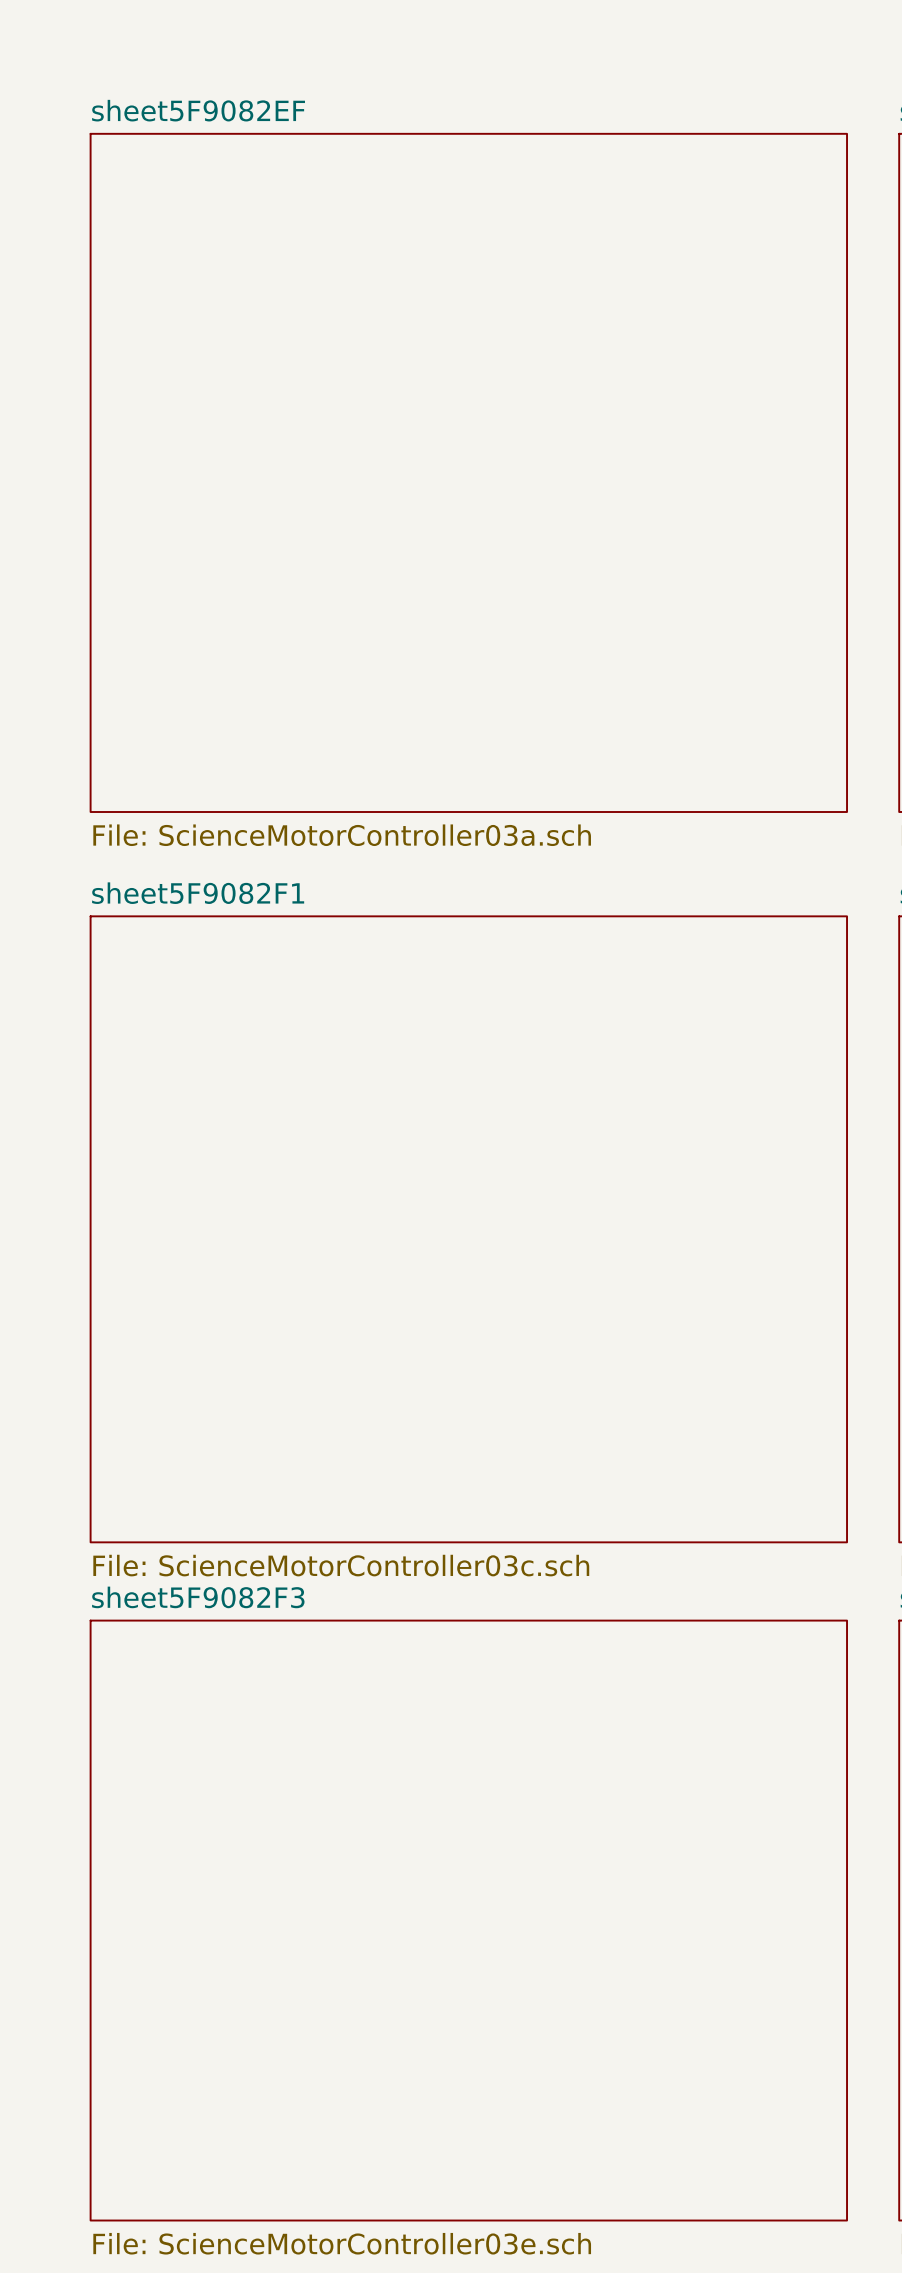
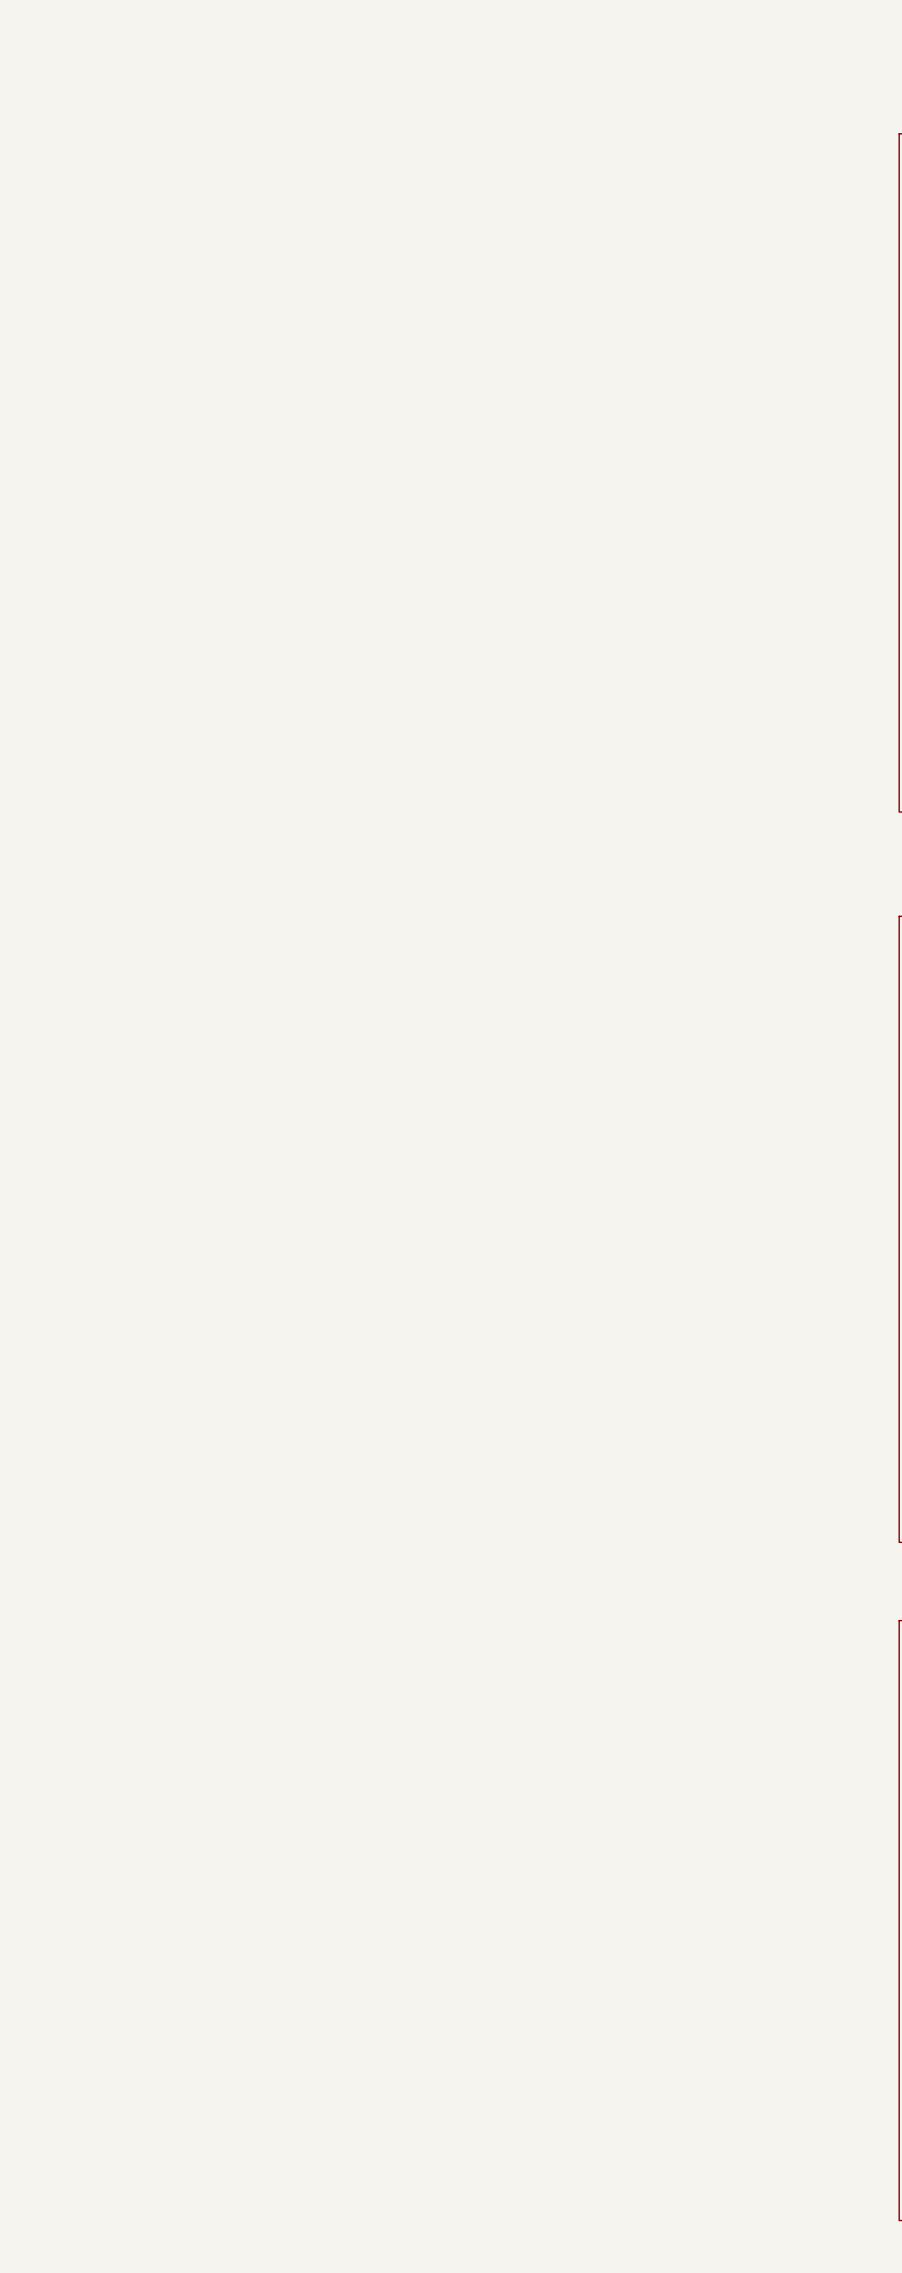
sheet sheet5F9082EF: File: ScienceMotorController03a.sch (468, 472) -> none
sheet sheet5F9082F1: File: ScienceMotorController03c.sch (468, 1229) -> none
sheet sheet5F9082F3: File: ScienceMotorController03e.sch (468, 1920) -> none

